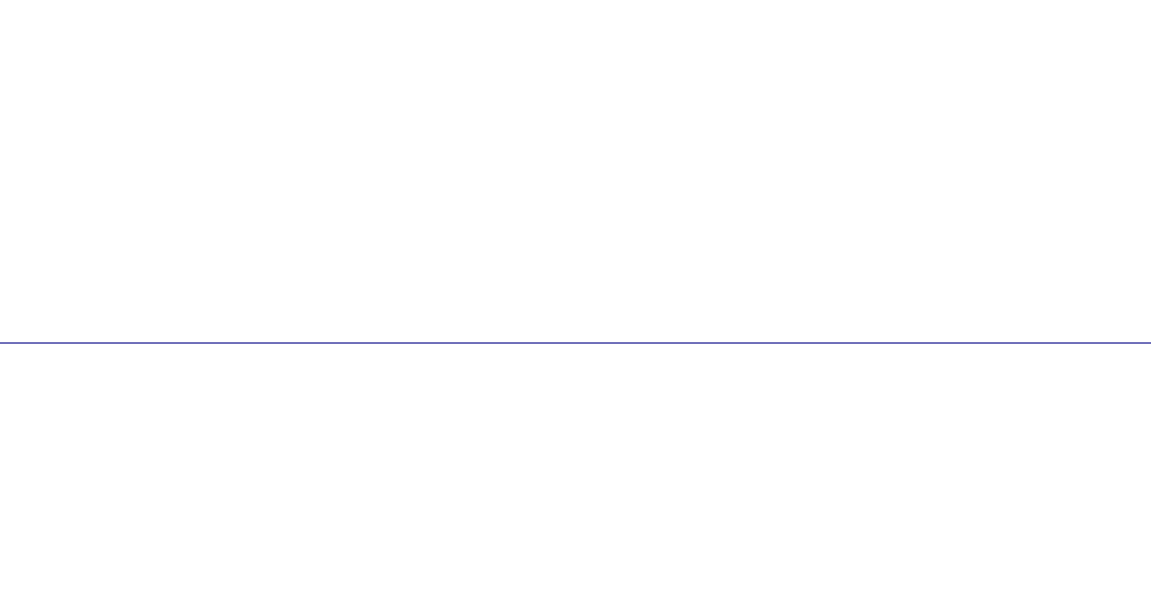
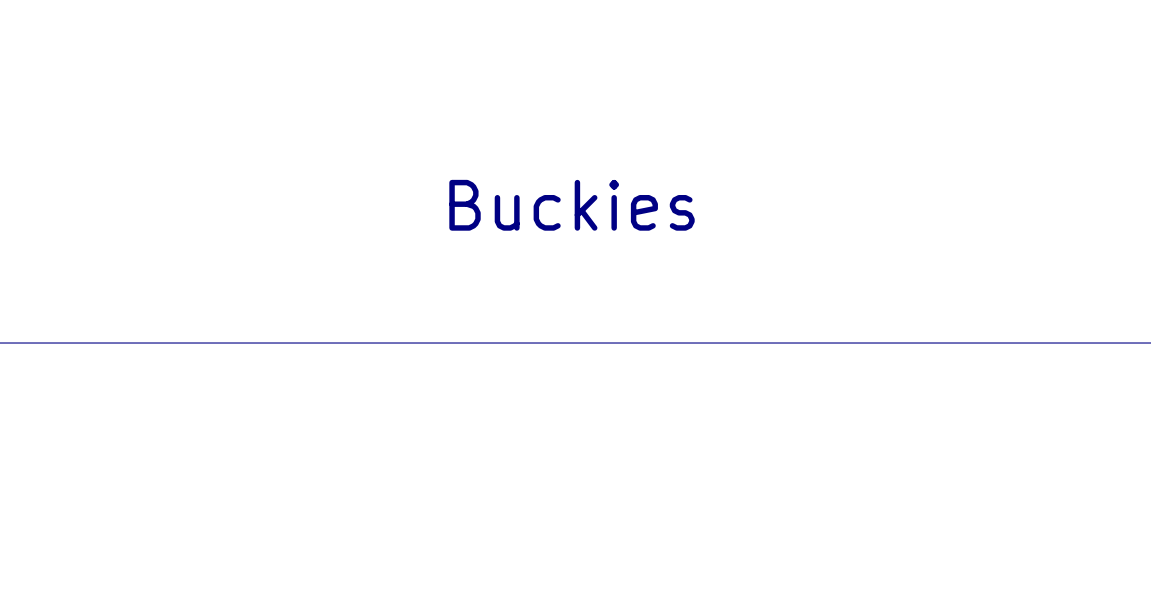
text: none -> Buckies (572, 205)

